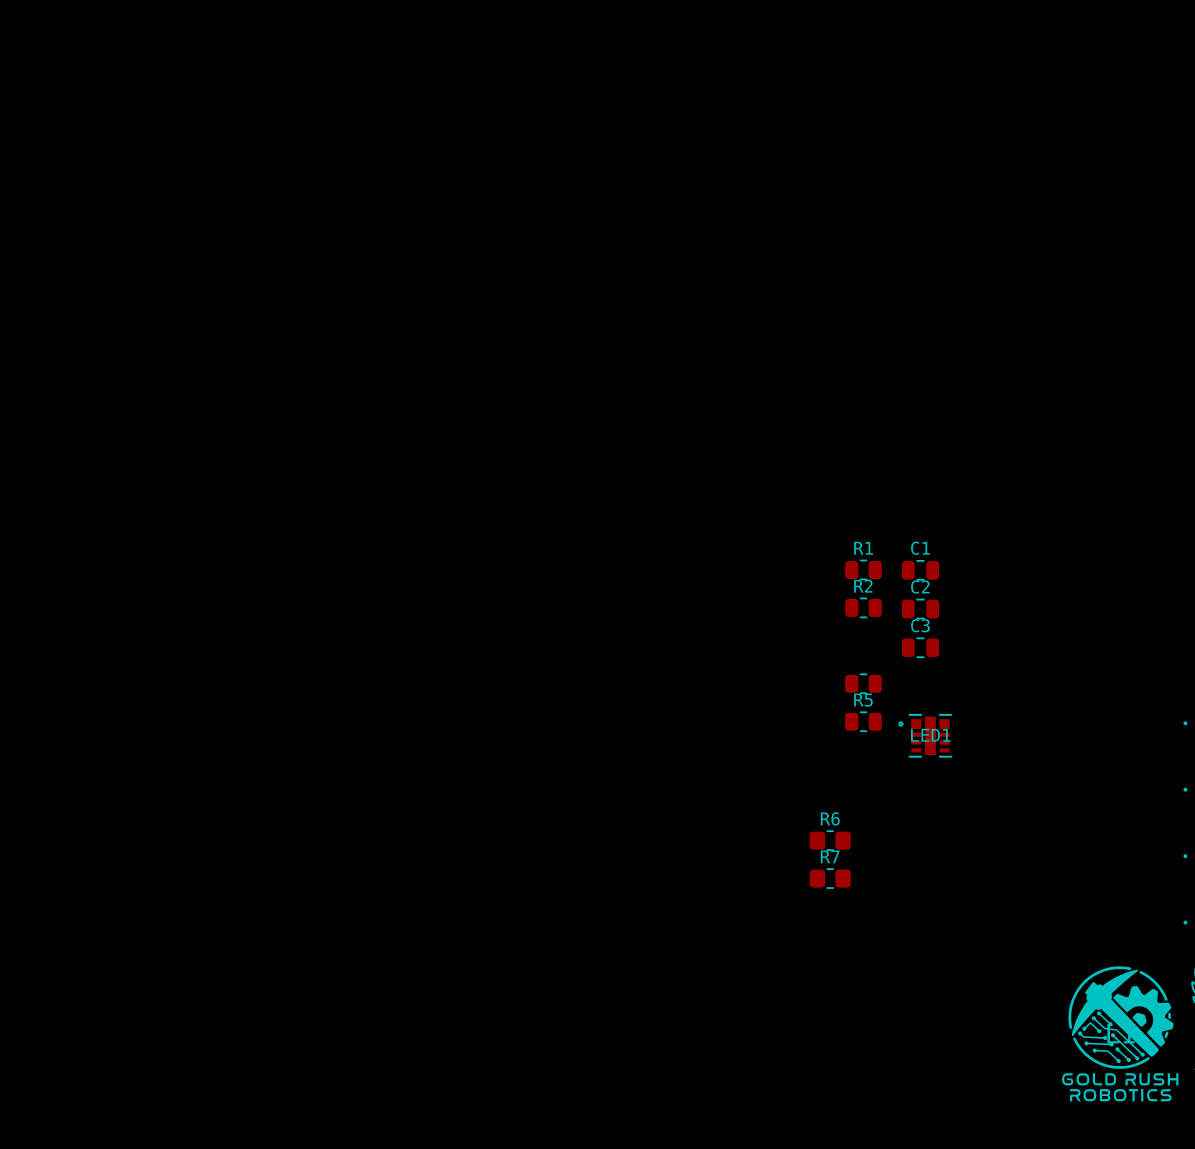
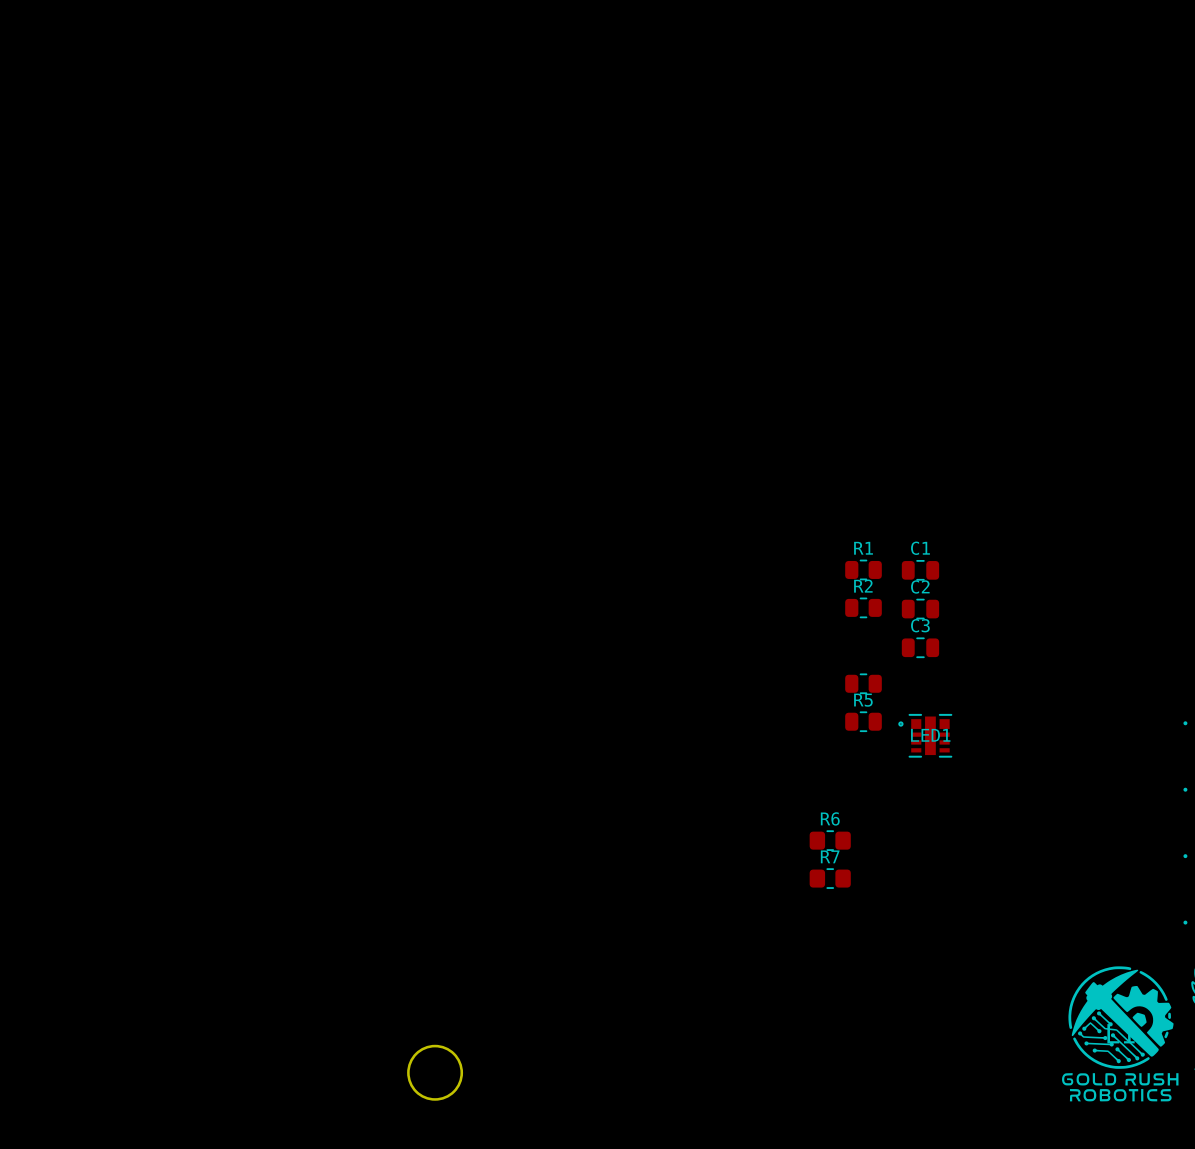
round board edge: none -> [407, 1044, 464, 1101]

